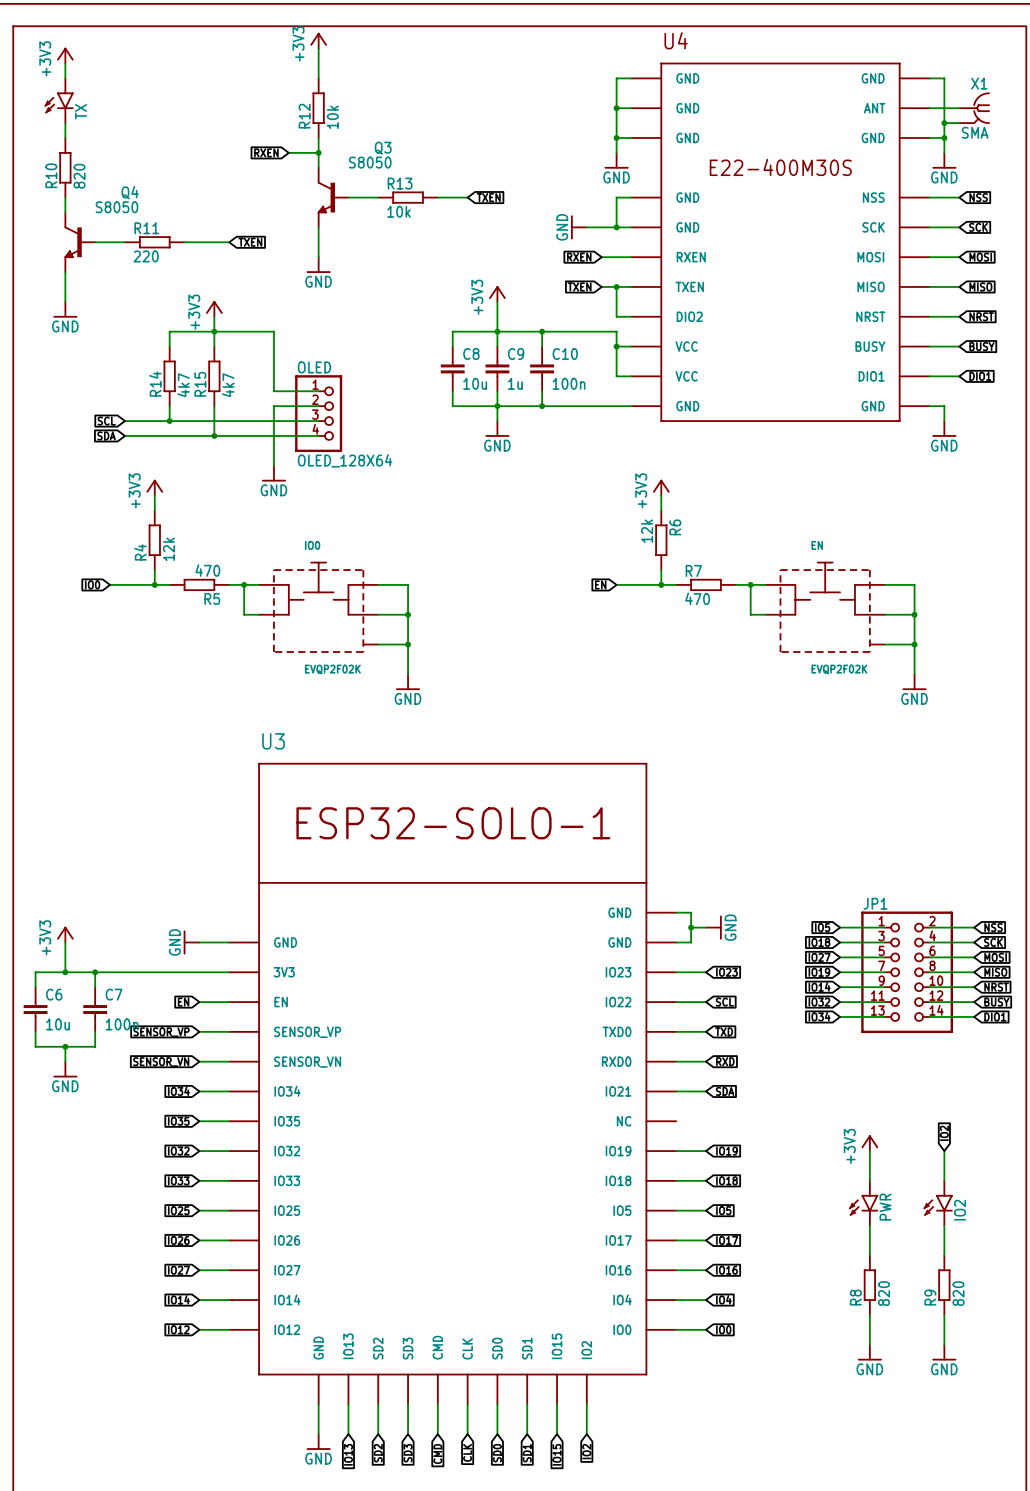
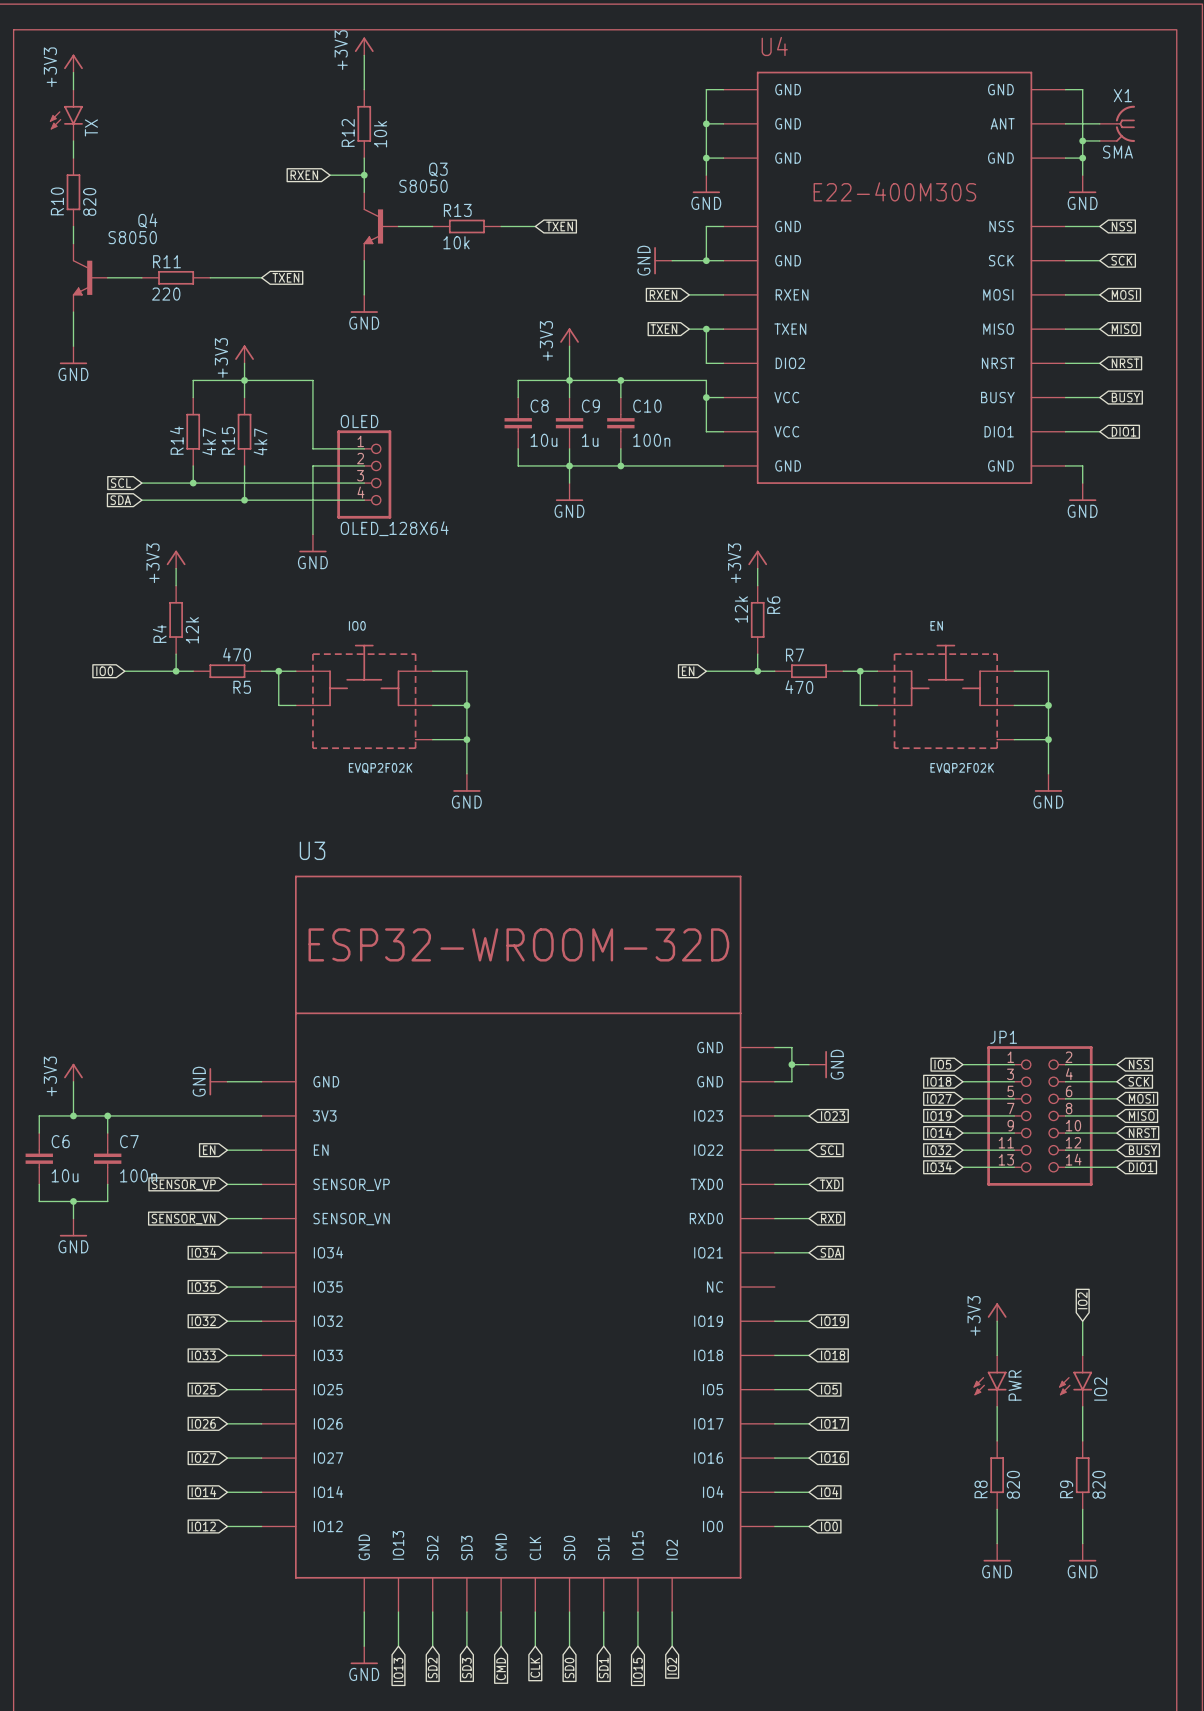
U3 text: ESP32-SOLO-1 (453, 823) -> ESP32-WROOM-32D (518, 944)

